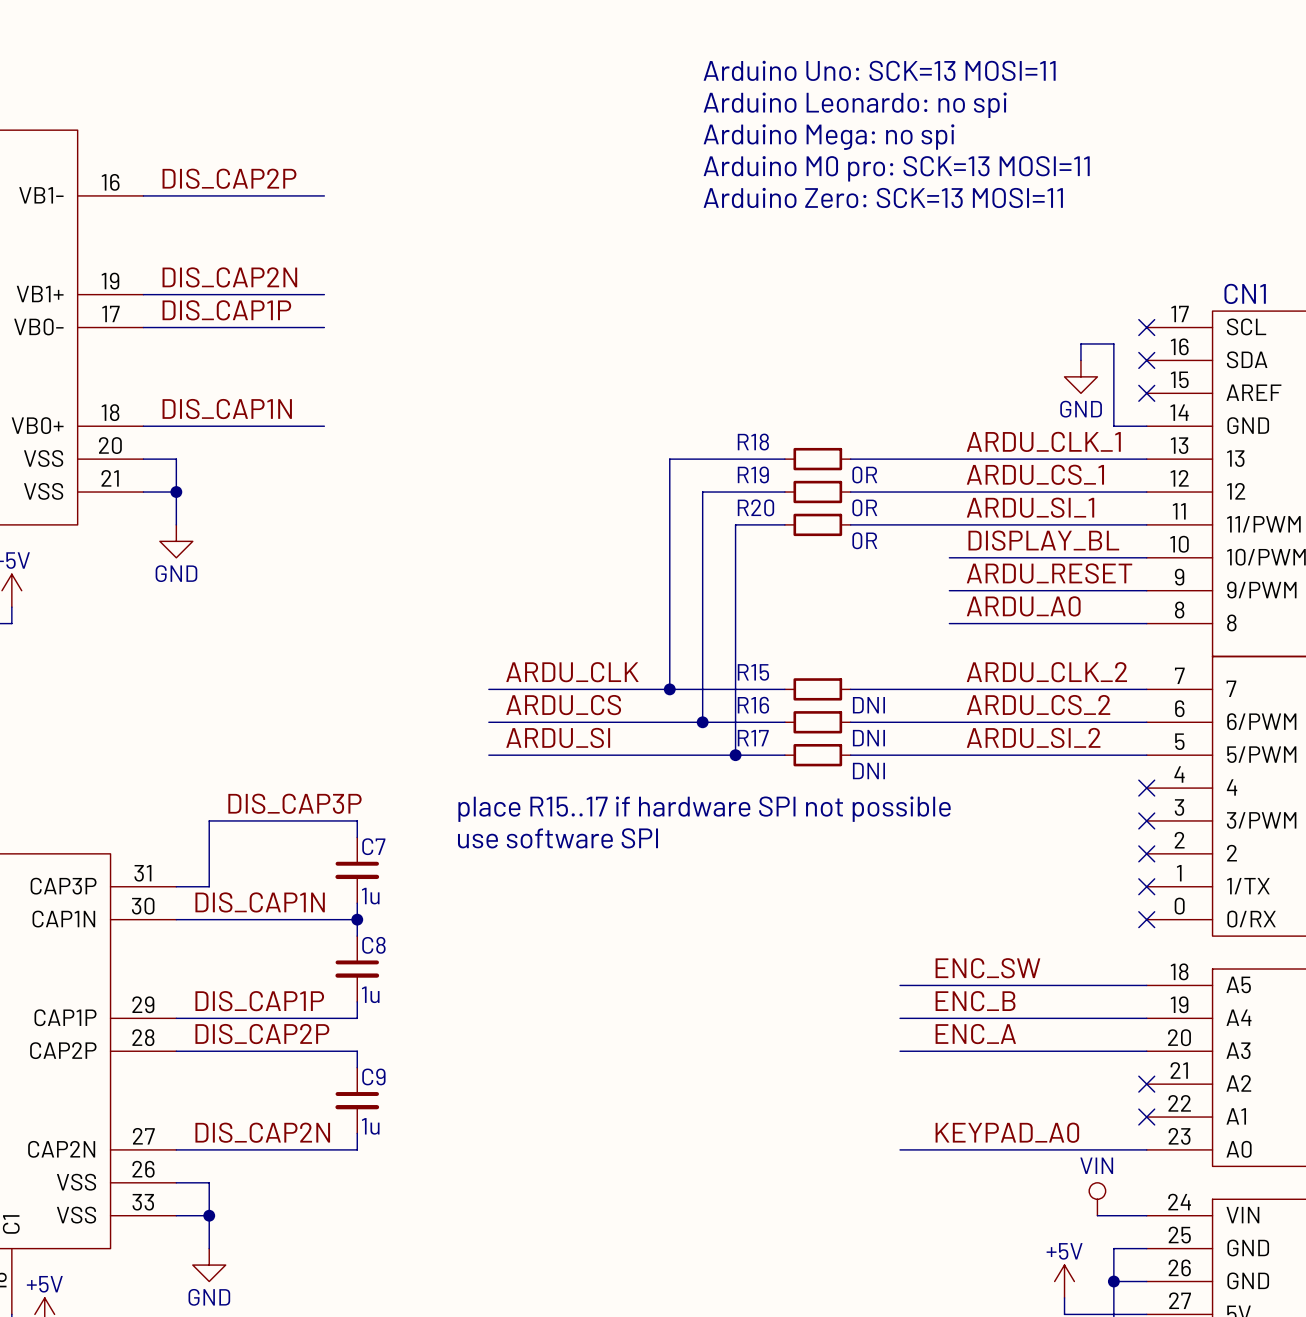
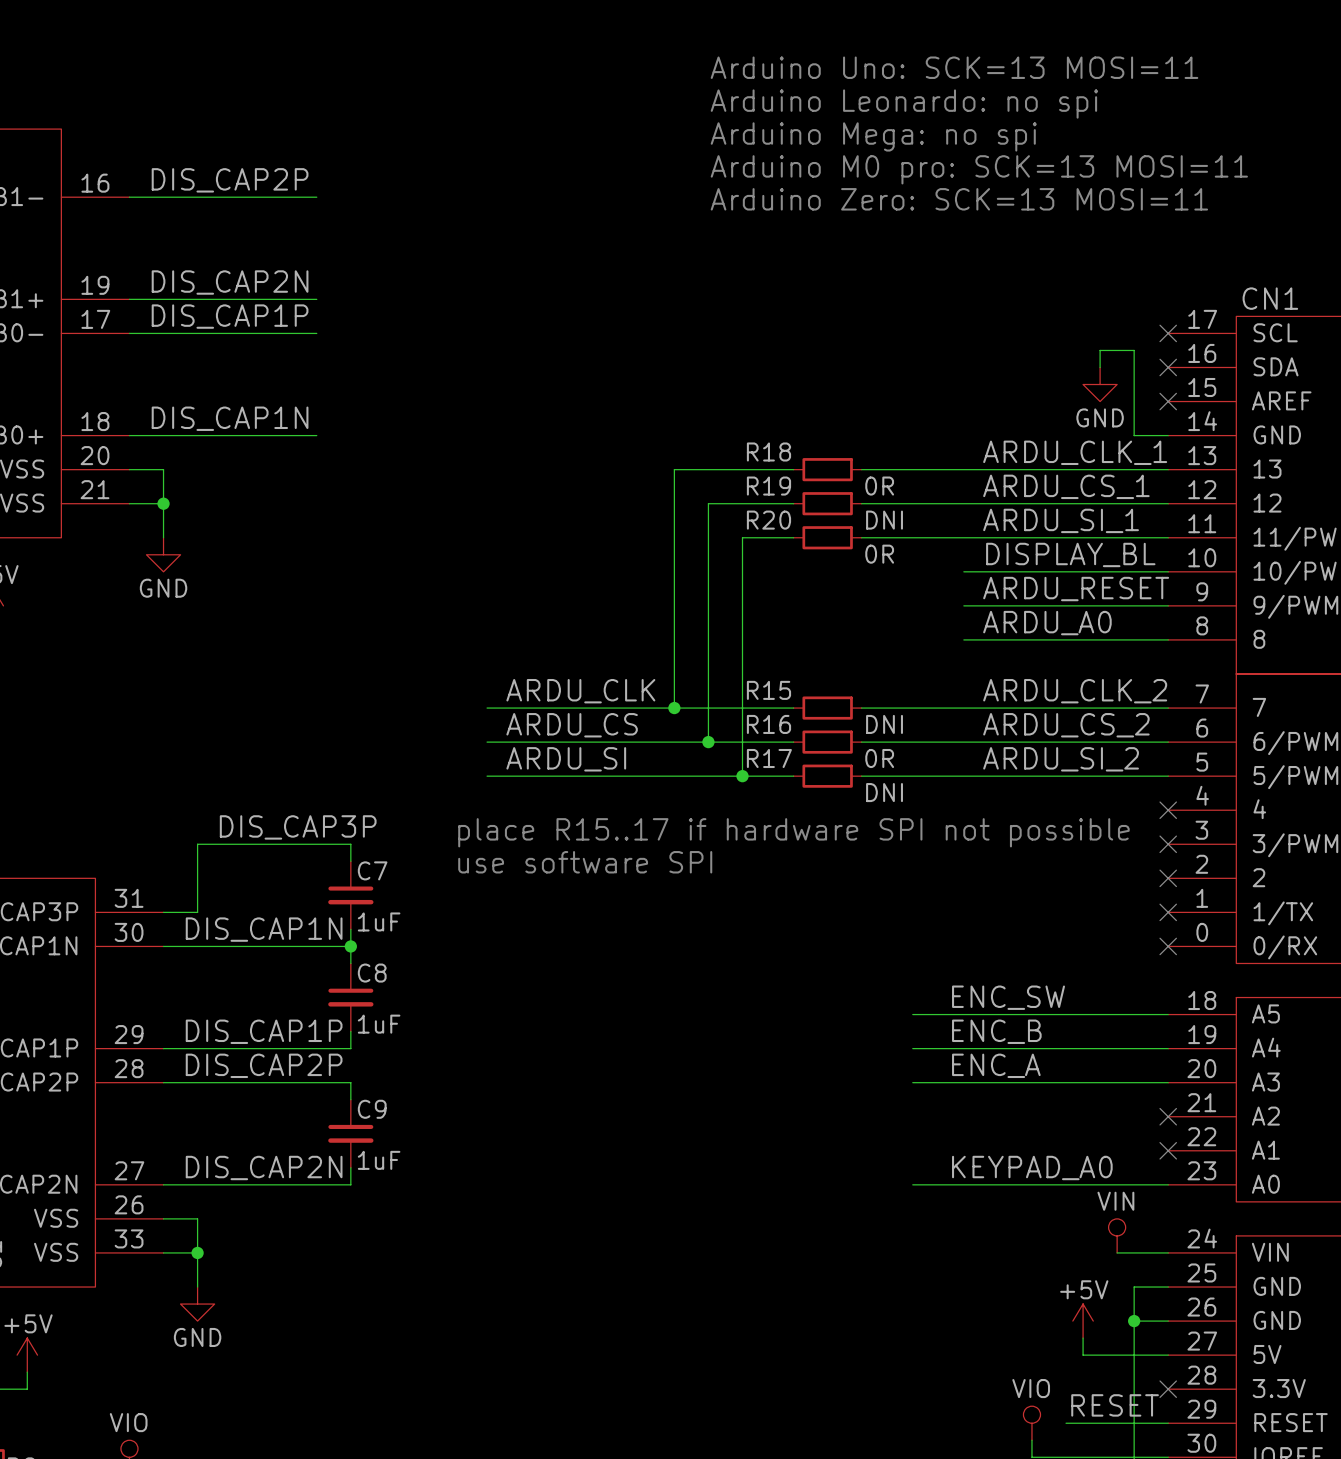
R19 value: 0R (864, 507) -> DNI (884, 520)
R16 value: DNI (868, 738) -> 0R (879, 758)
C7 value: 1u (370, 896) -> 1uF (379, 921)
C8 value: 1u (370, 994) -> 1uF (379, 1024)
C9 value: 1u (370, 1126) -> 1uF (379, 1160)

